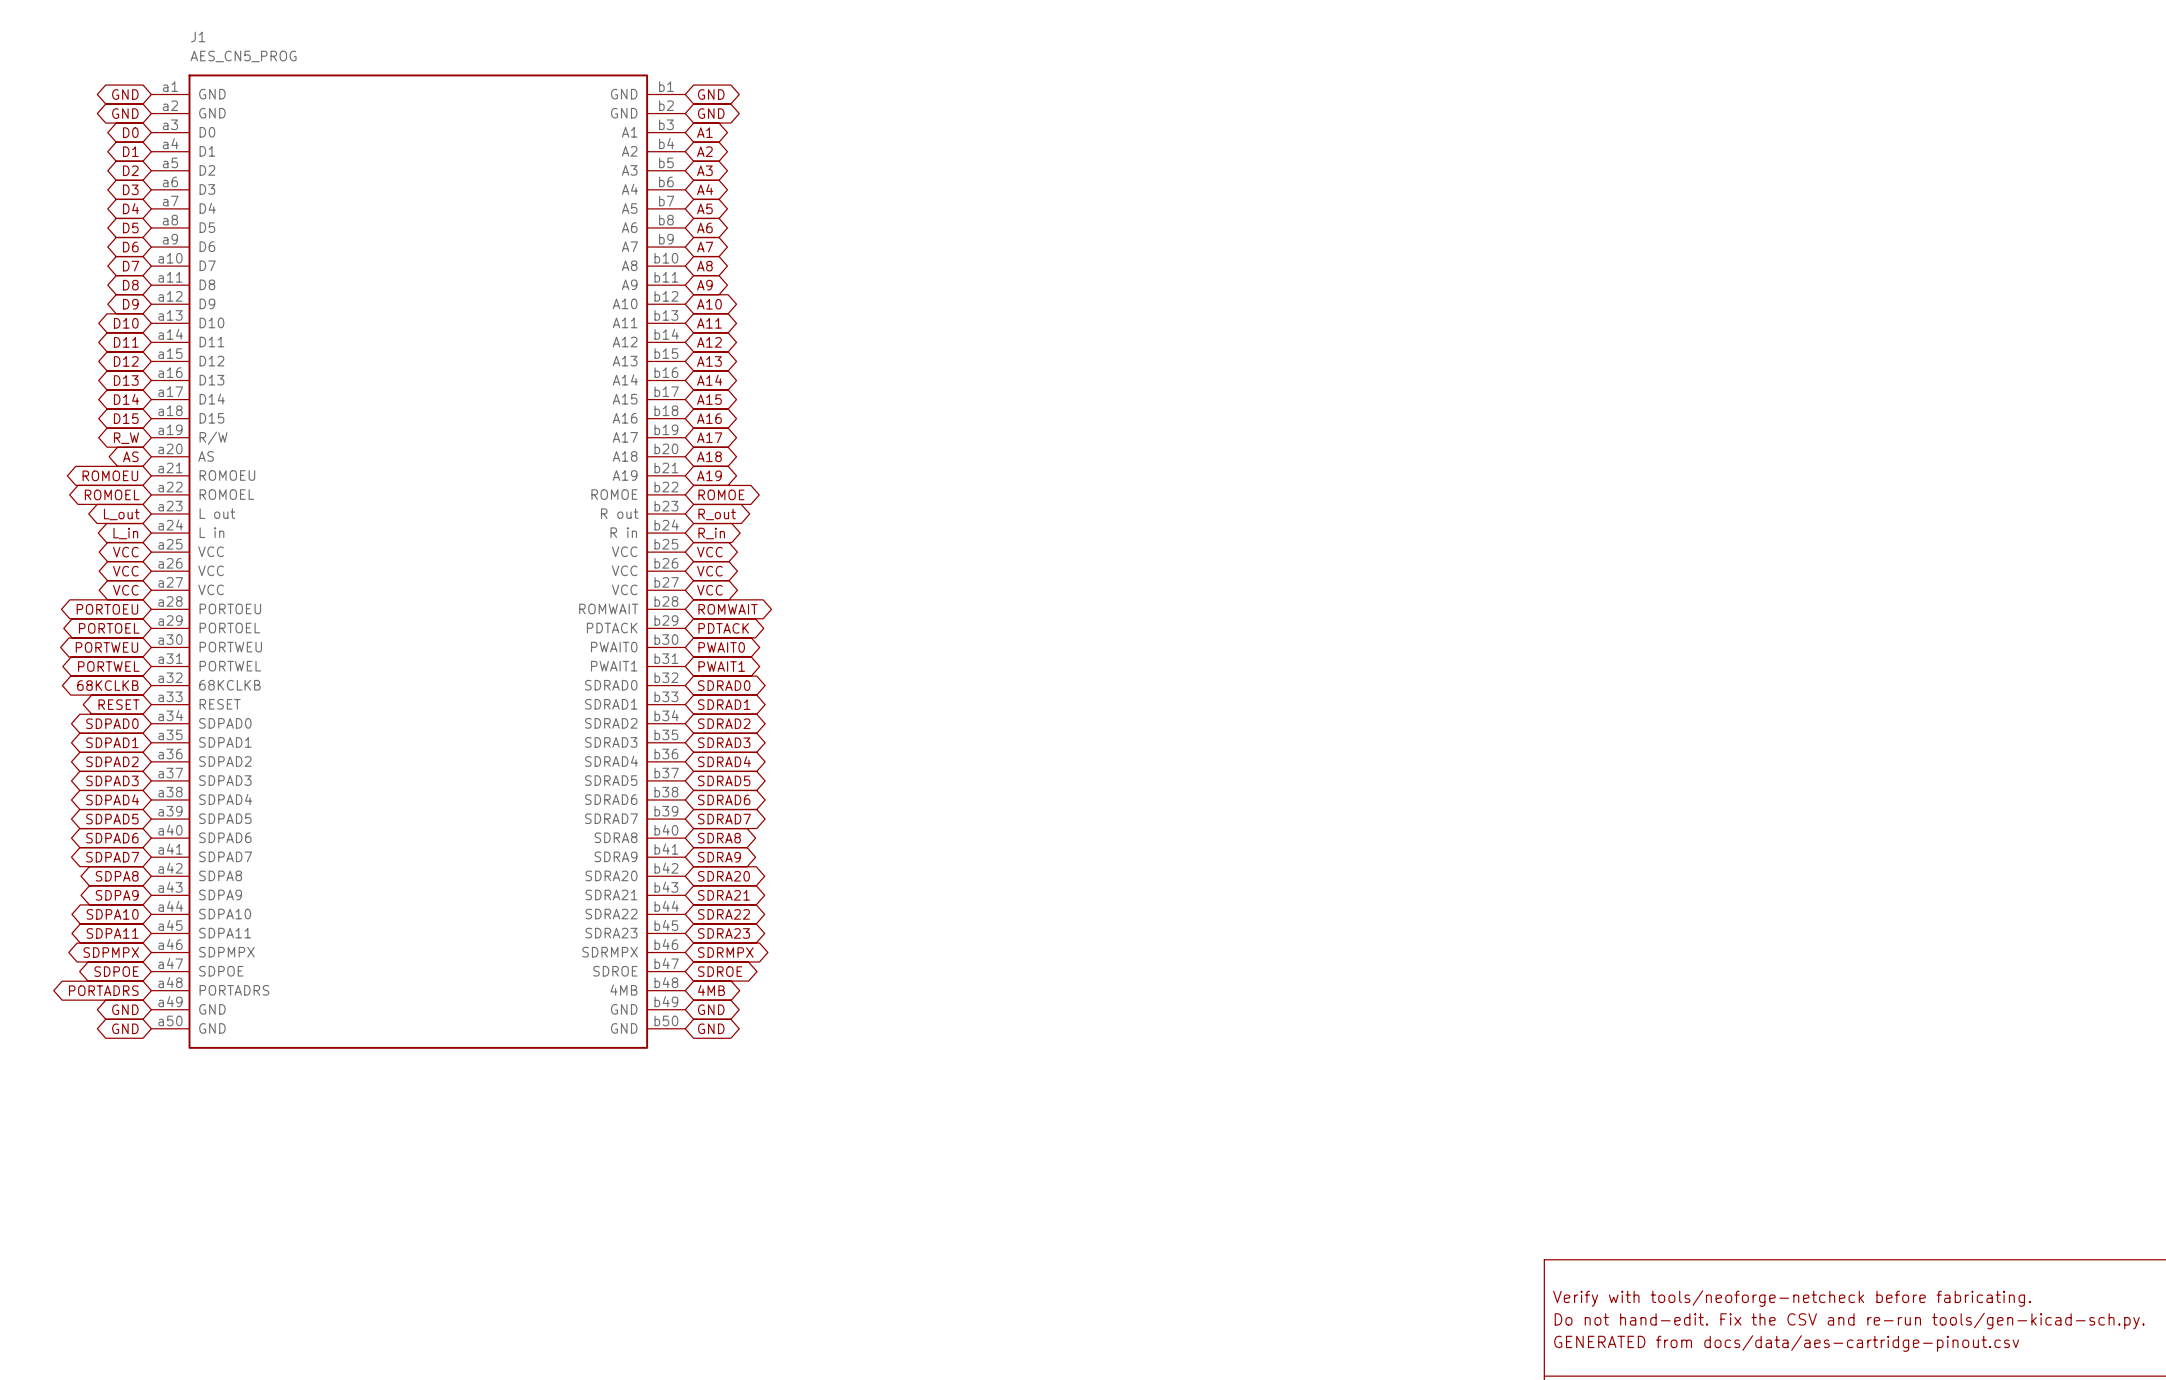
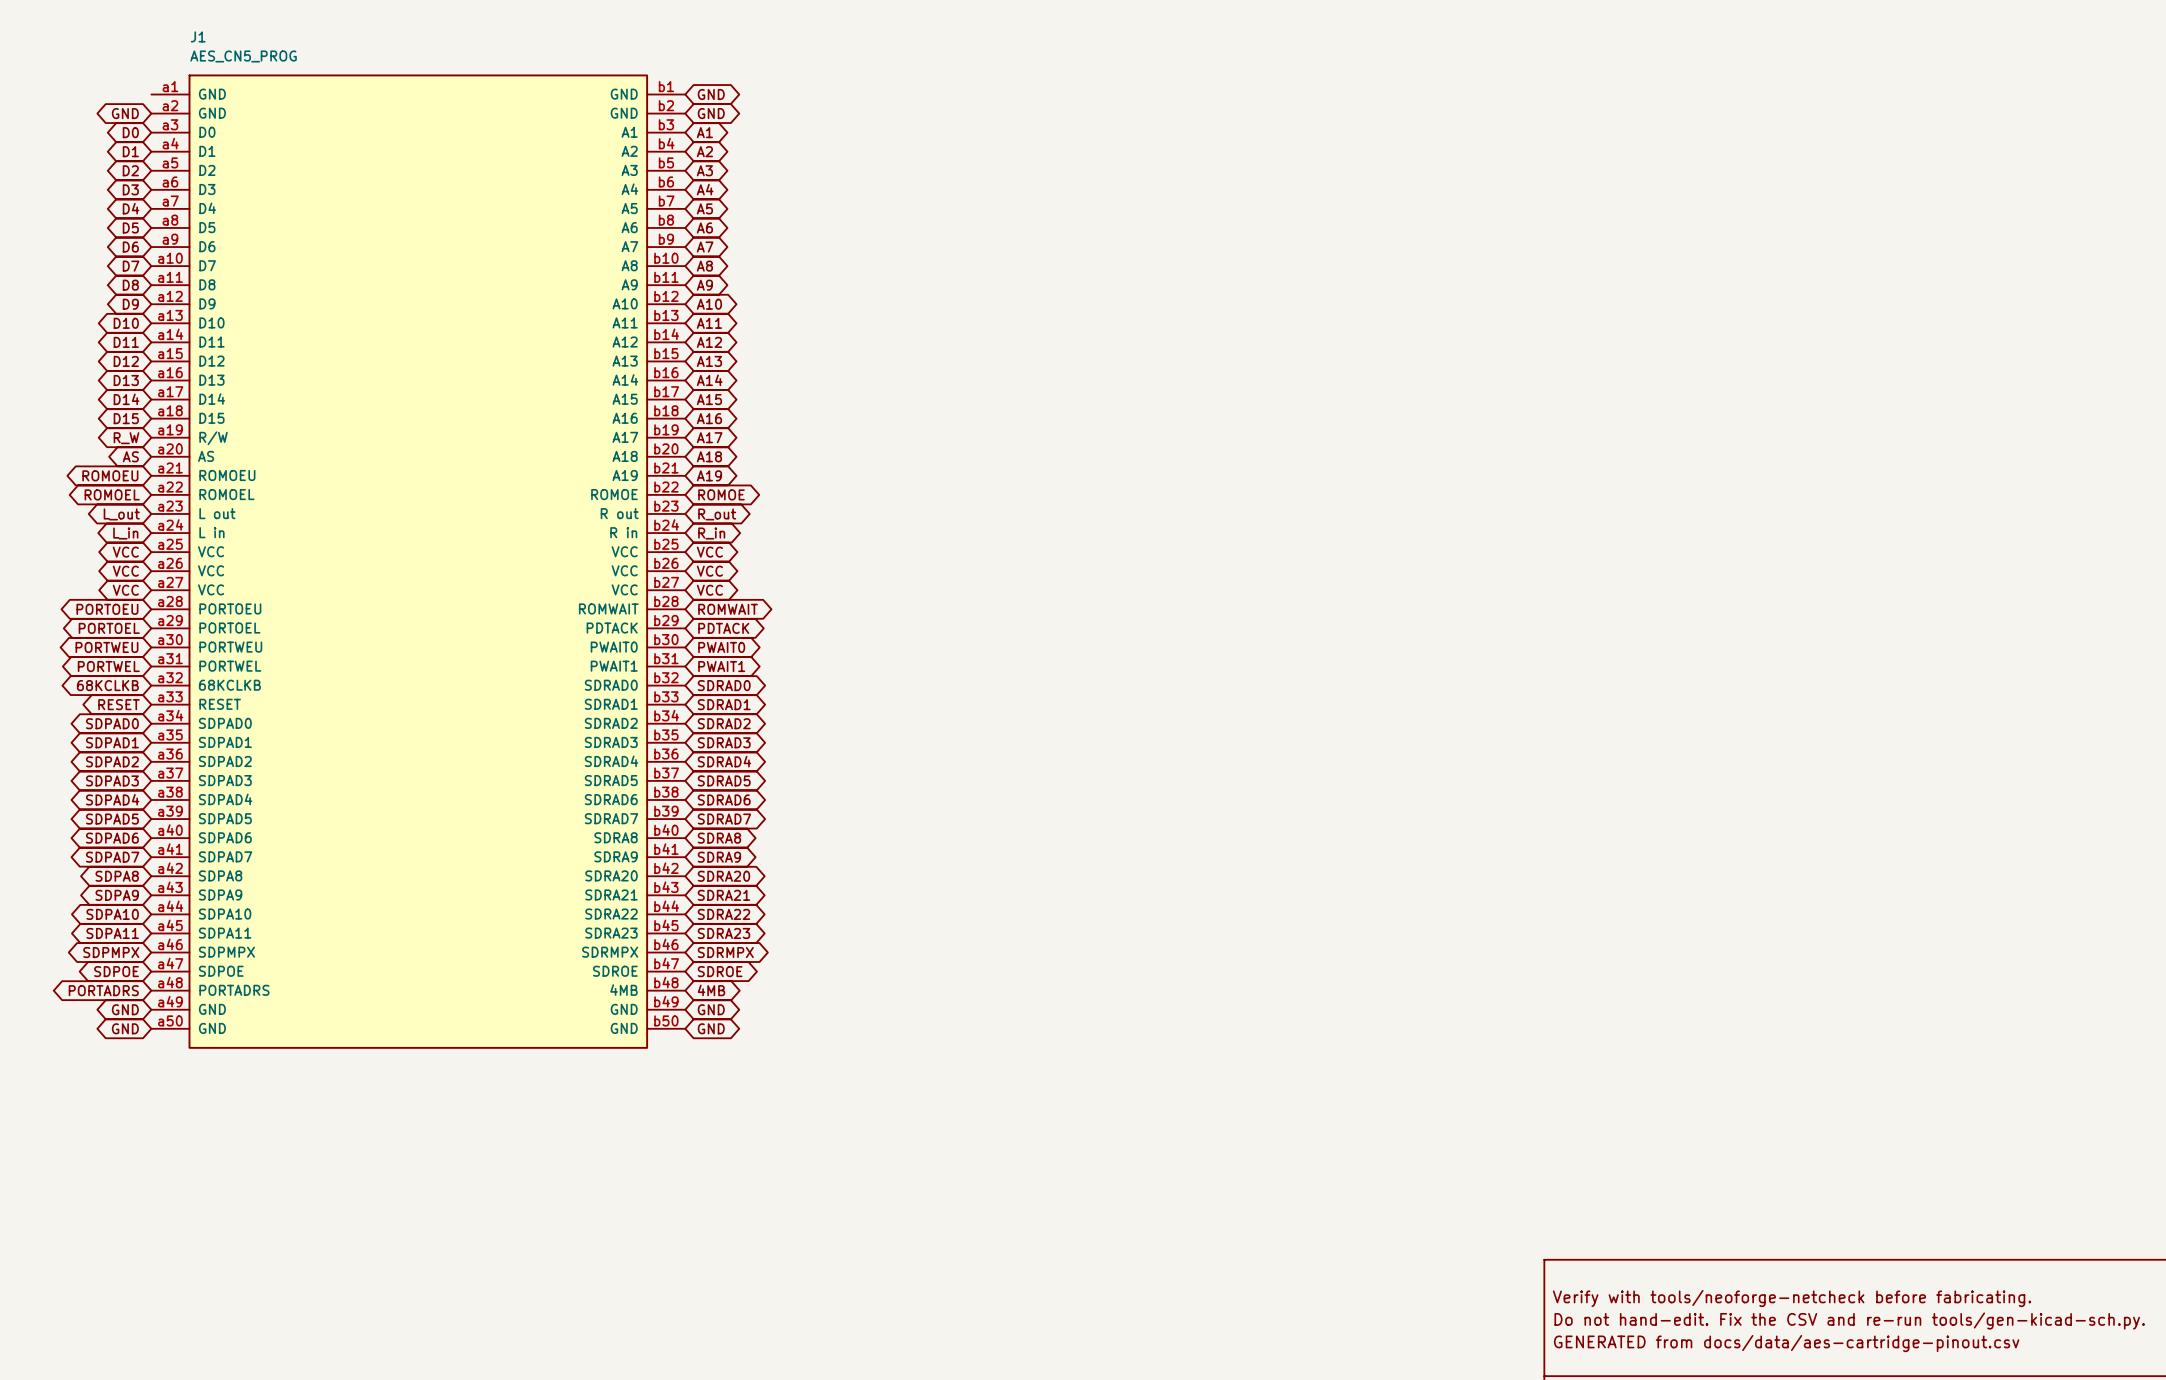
global label: GND (125, 94) -> none

